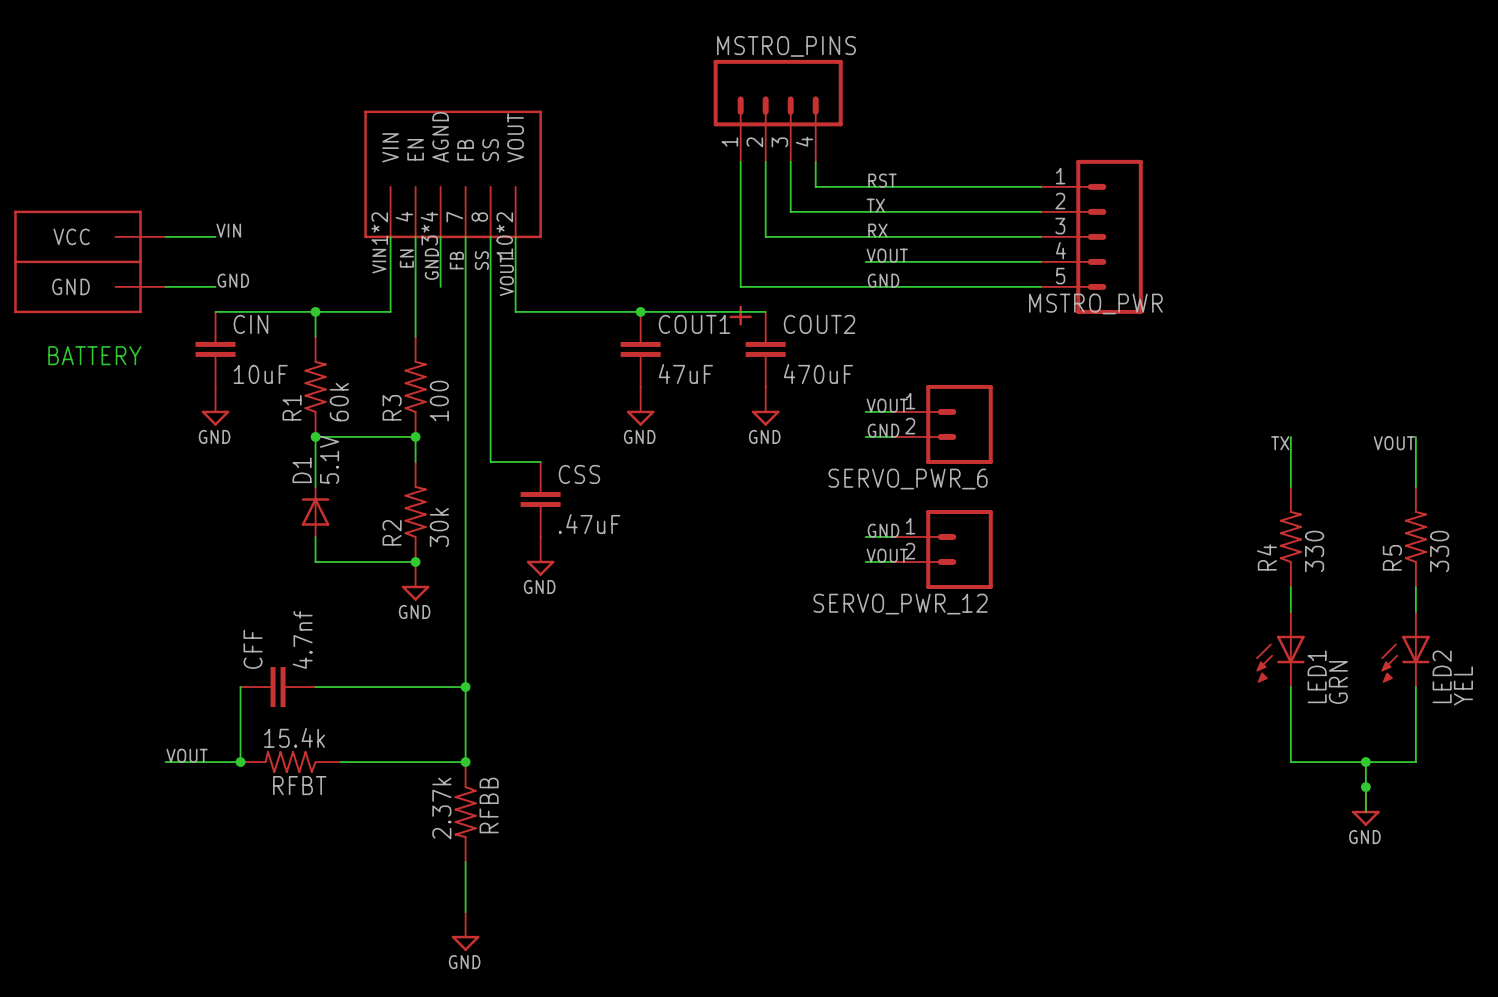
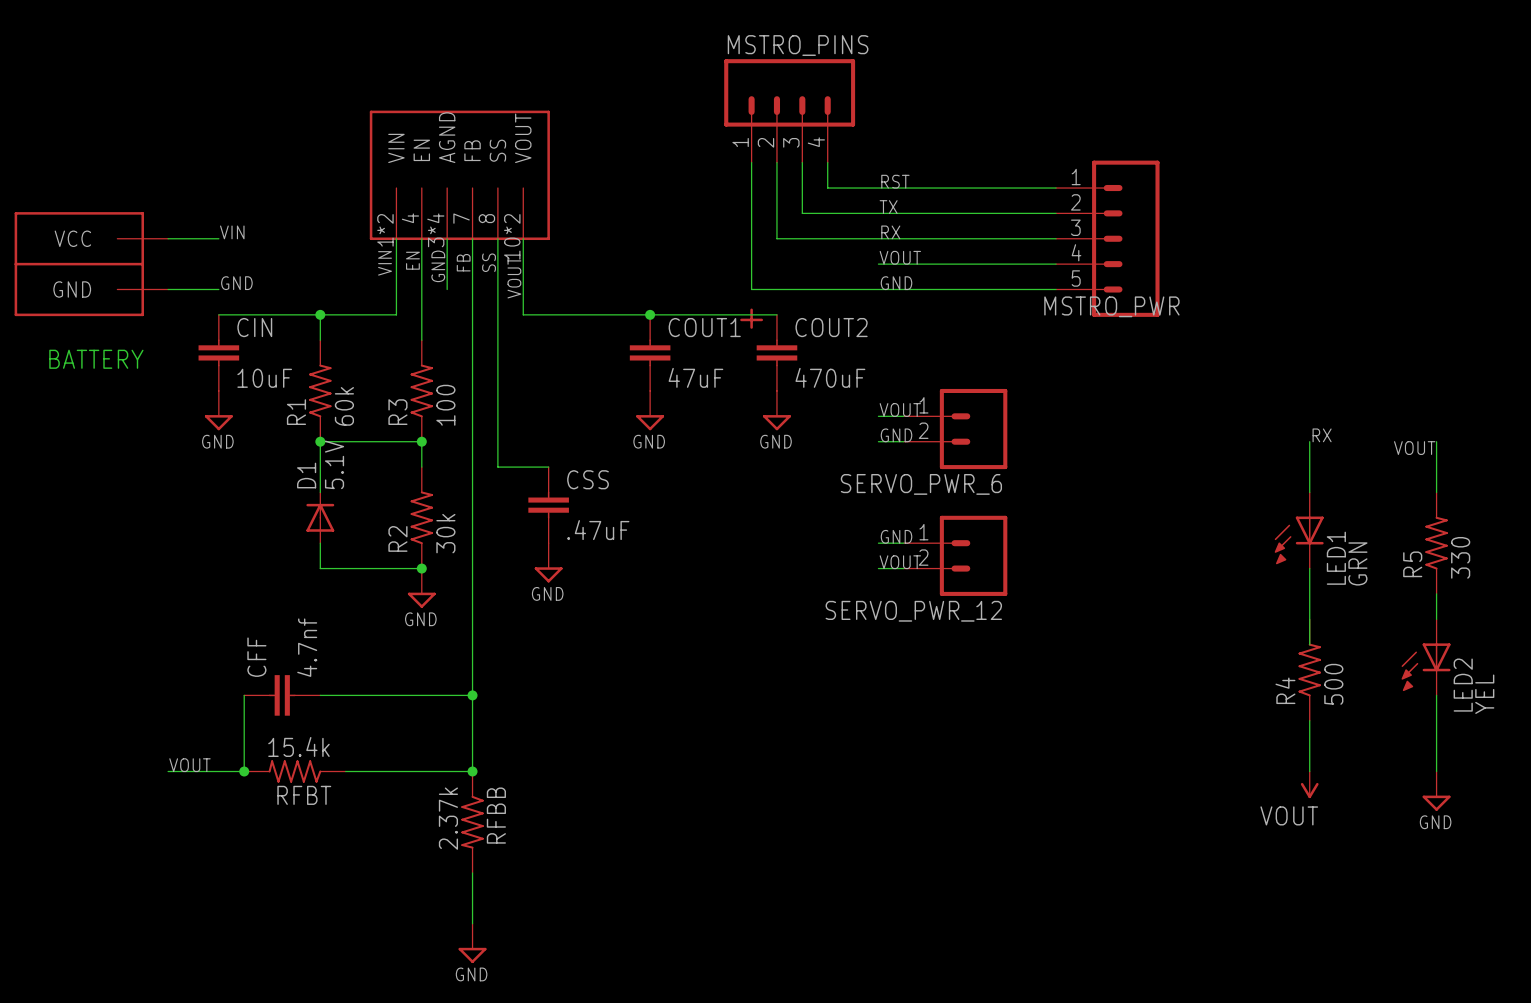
label: TX (1280, 443) -> RX (1322, 435)
R4 position: (1290, 536) -> (1309, 670)
R4 value: 330 (1314, 551) -> 500 (1333, 684)
LED1 position: (1280, 649) -> (1299, 530)
wire: (1290, 762) (1415, 762) -> none
wire: (1365, 762) (1365, 812) -> none
junction: (1365, 762) -> none
power symbol: none -> VOUT (1309, 784)
junction: (1365, 787) -> none
power symbol position: GND (1365, 806) -> GND (1436, 791)

